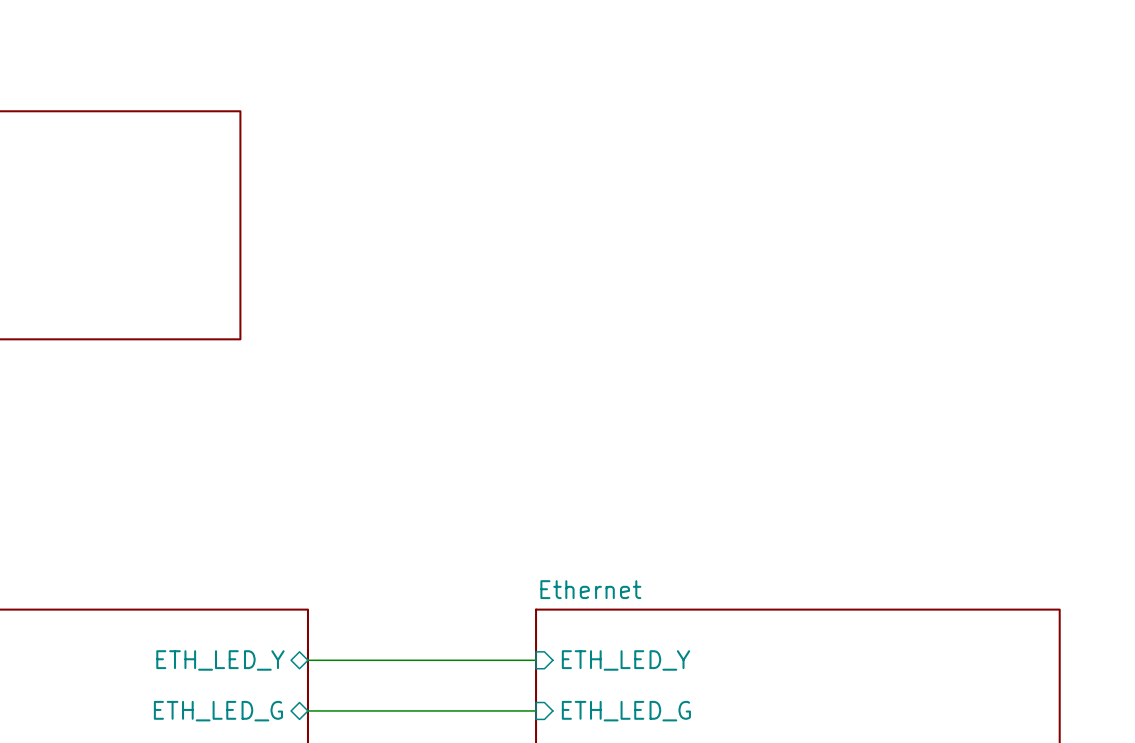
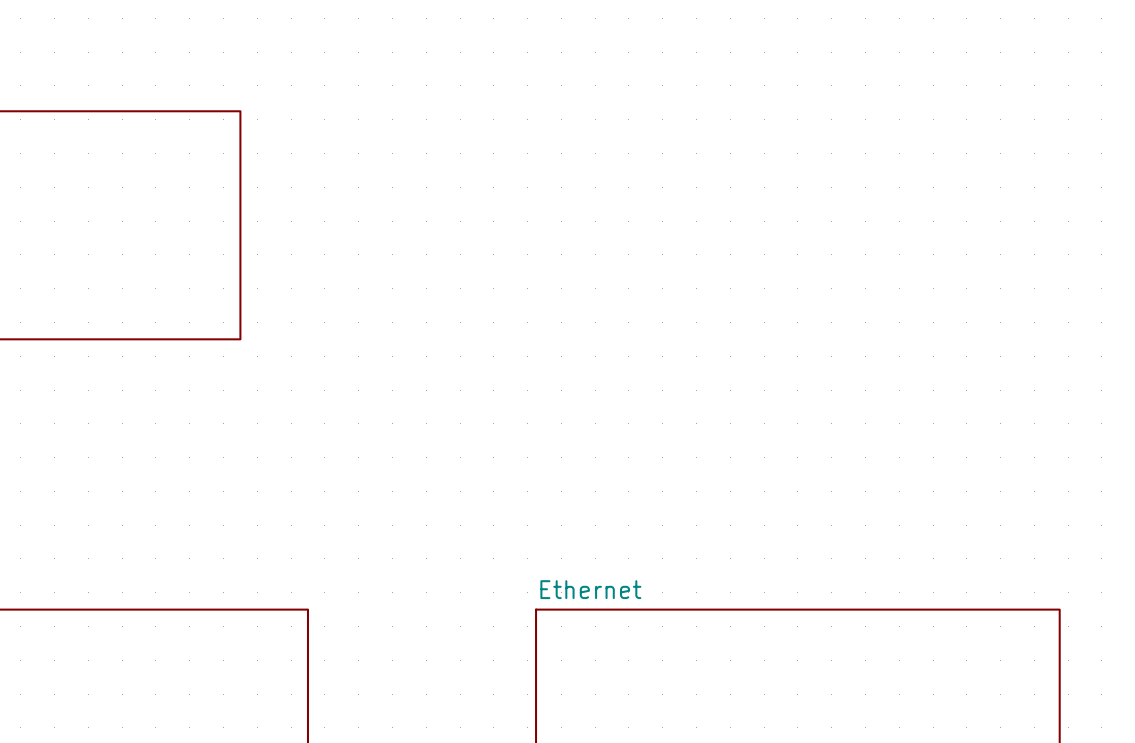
sheet pin: ETH_LED_Y (220, 660) -> none
wire: (307, 660) (536, 660) -> none
sheet pin: ETH_LED_Y (625, 660) -> none
wire: (307, 710) (536, 710) -> none
sheet pin: ETH_LED_G (218, 711) -> none
sheet pin: ETH_LED_G (626, 711) -> none

